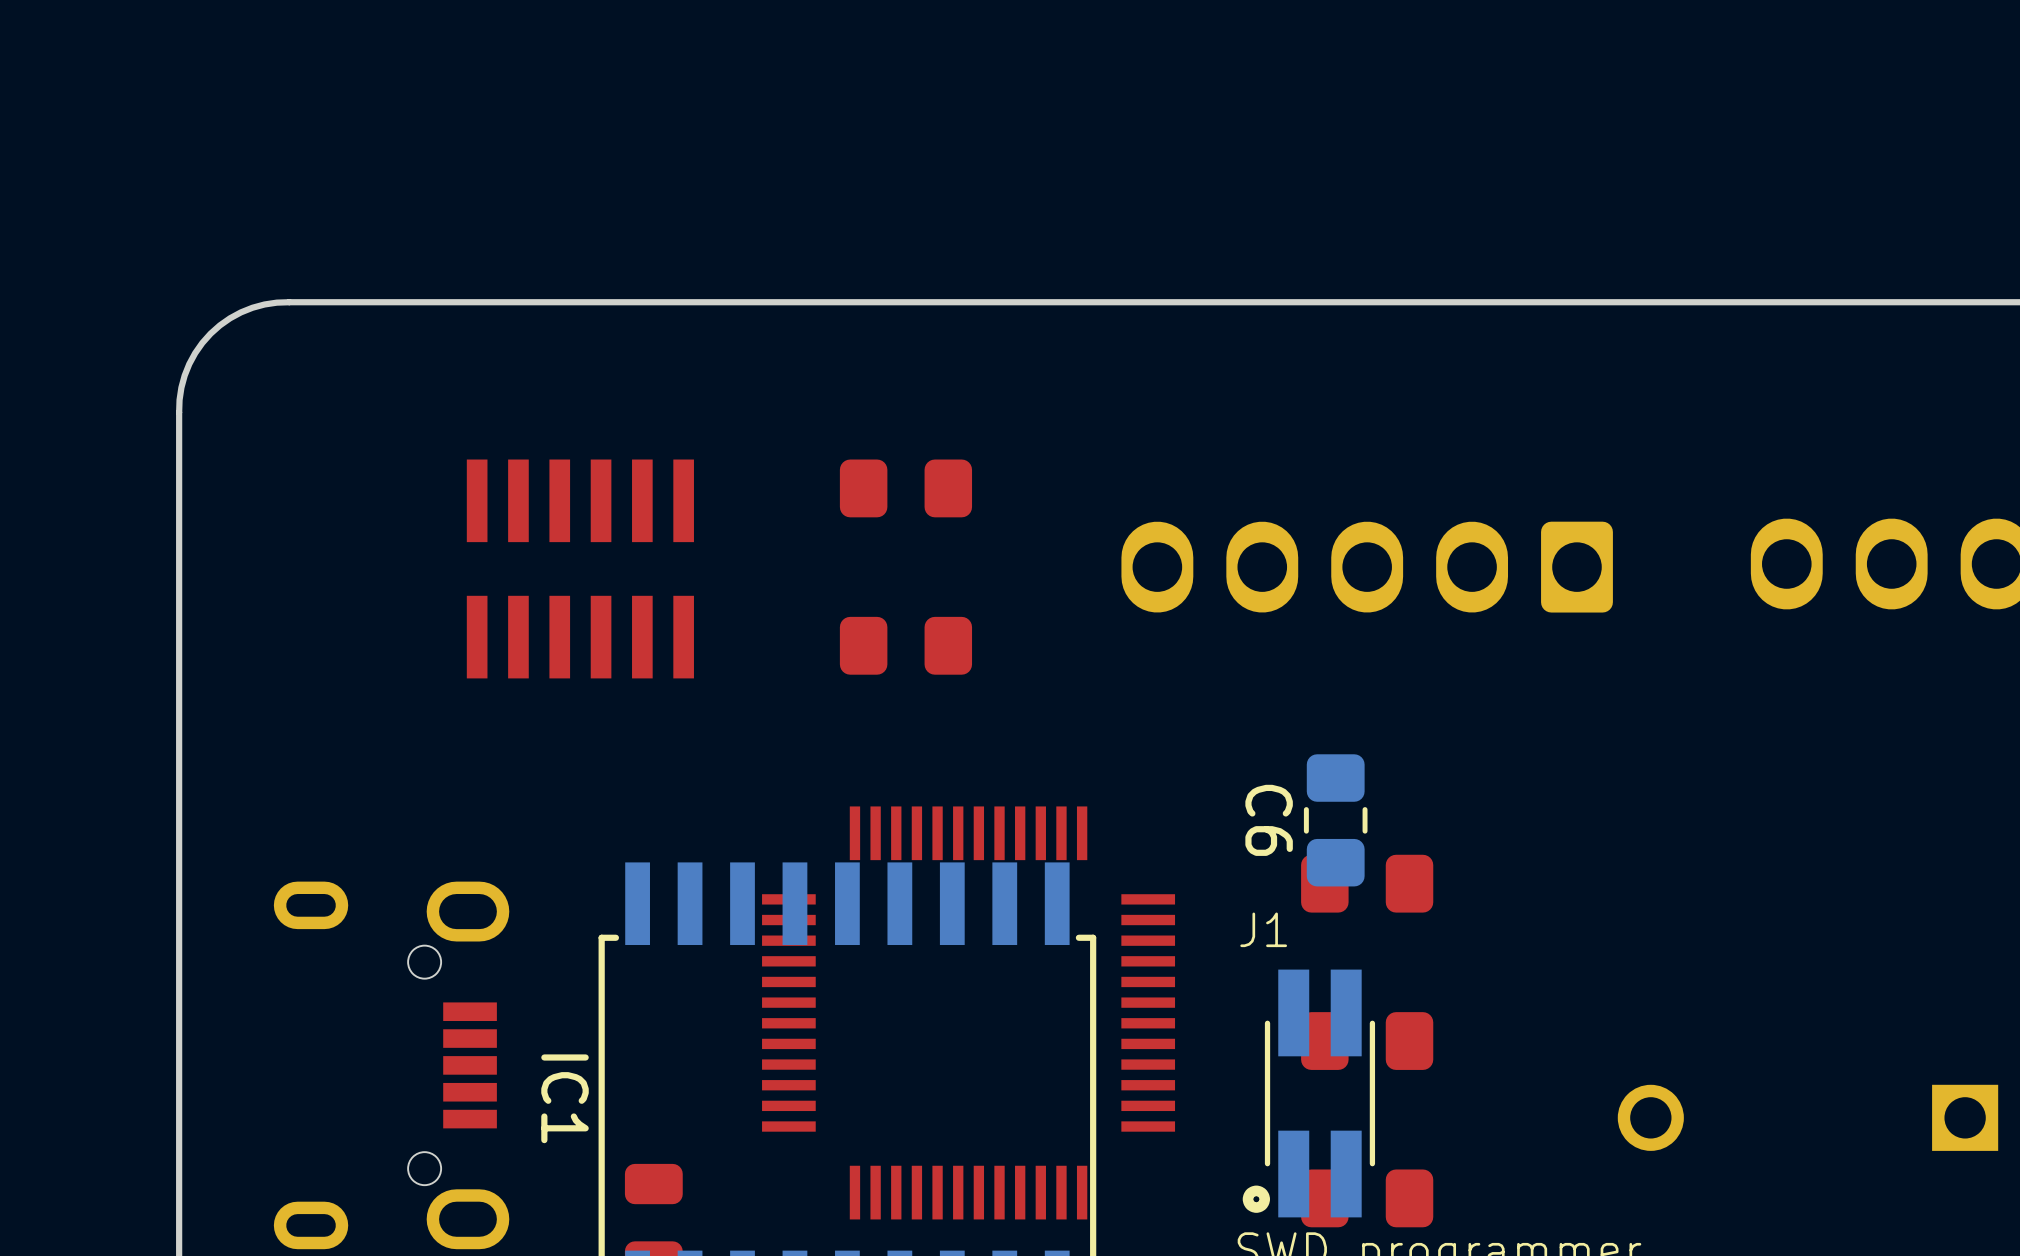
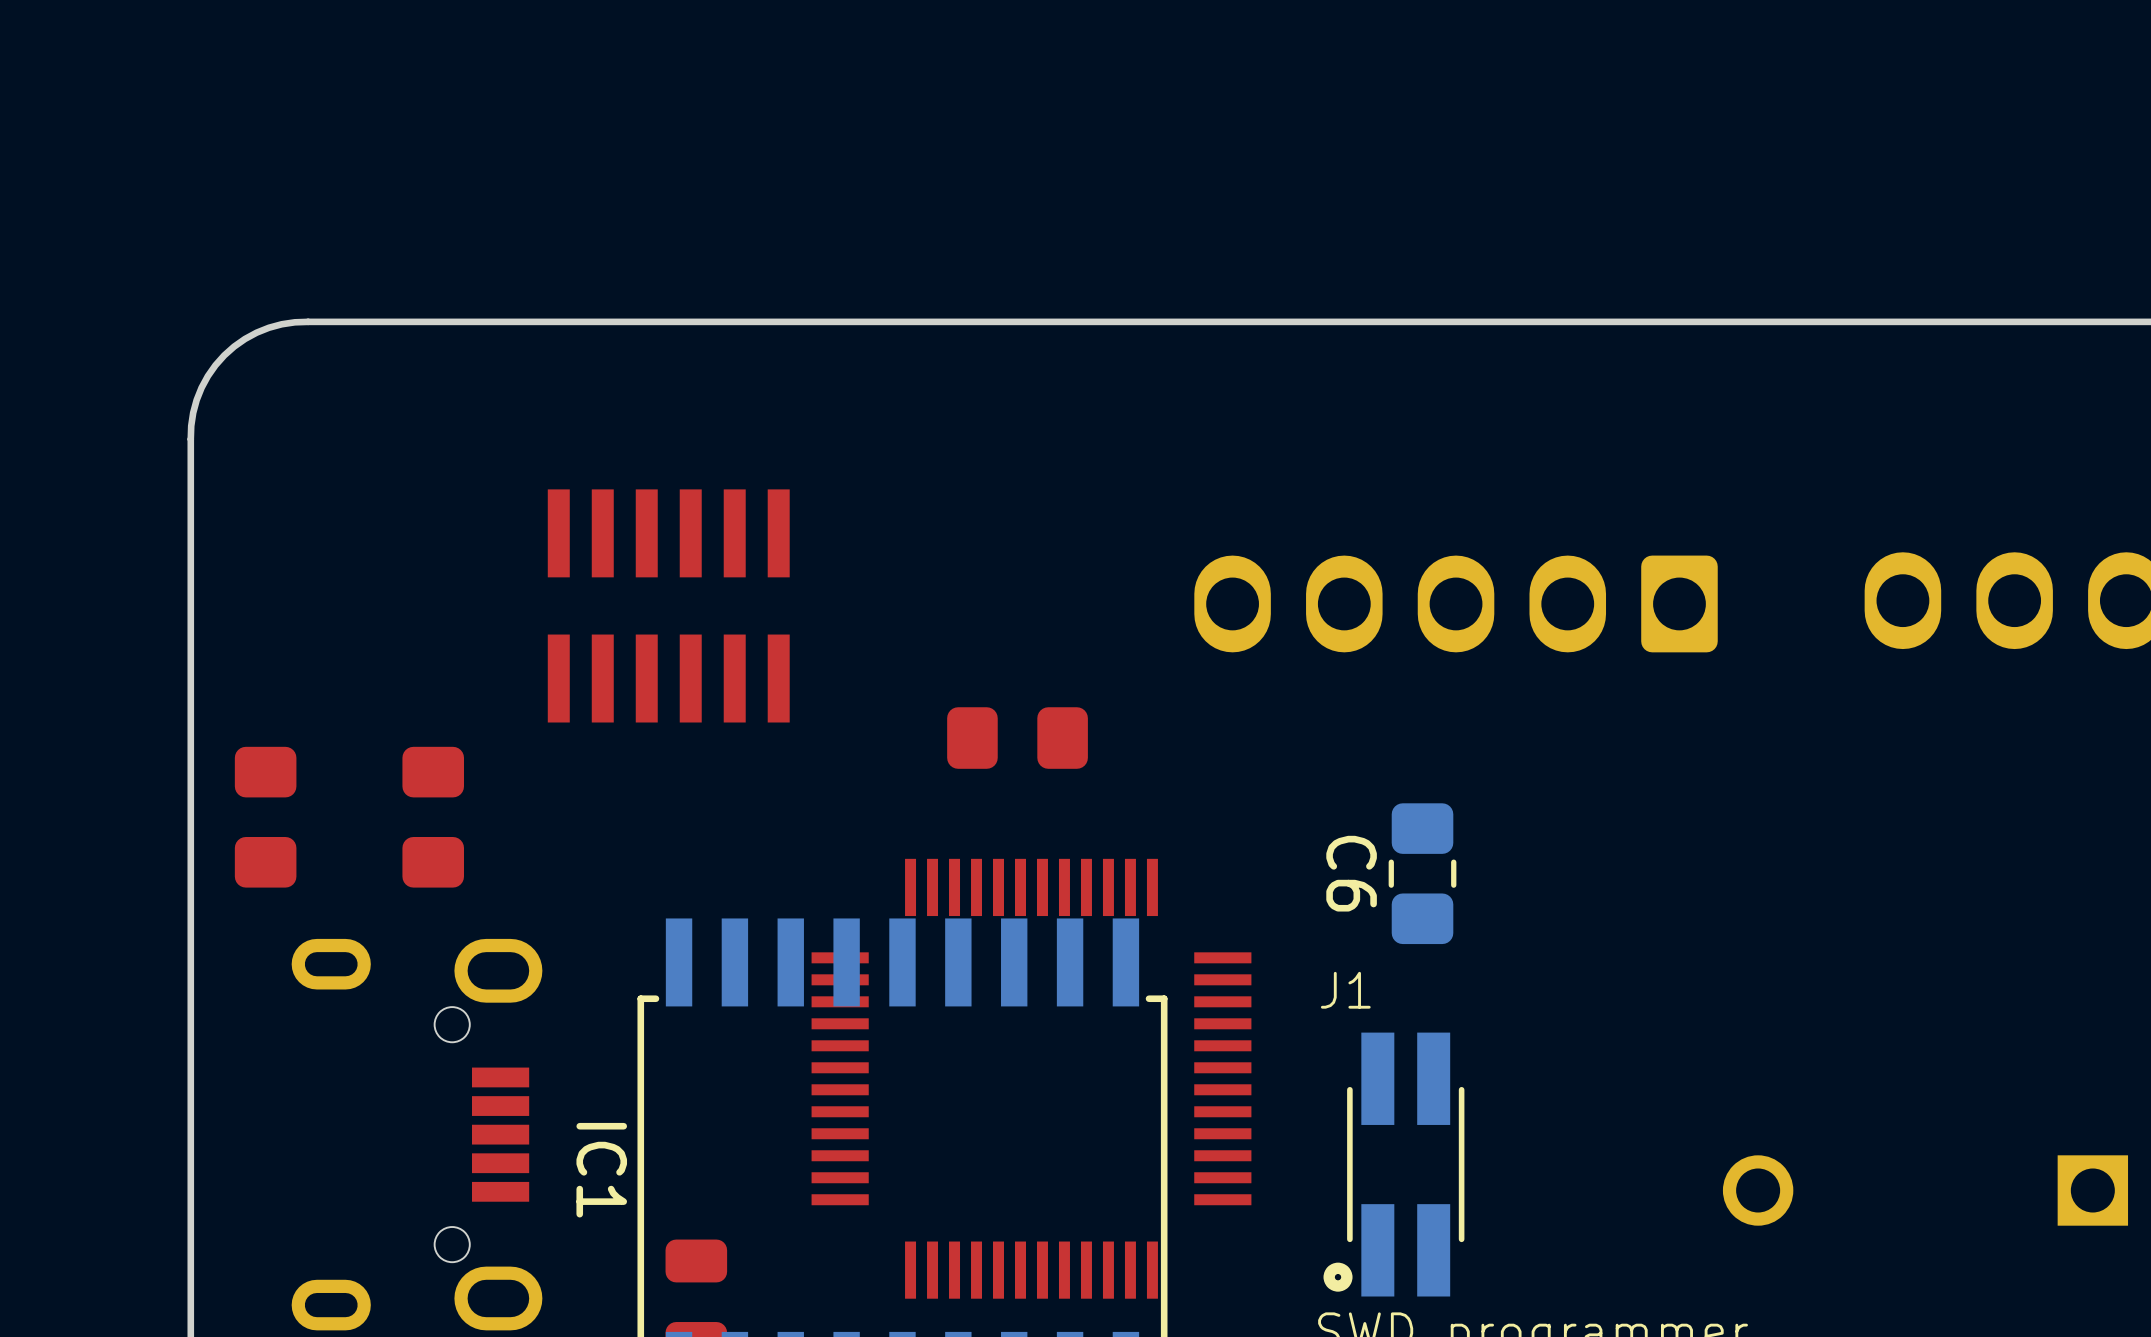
part: (905, 488) -> none
part position: (580, 568) -> (668, 605)
part position: (905, 645) -> (1017, 738)
part: none -> (265, 817)
part: none -> (433, 817)
part: (1367, 883) -> none
part: (1367, 1041) -> none
part: (1367, 1198) -> none

